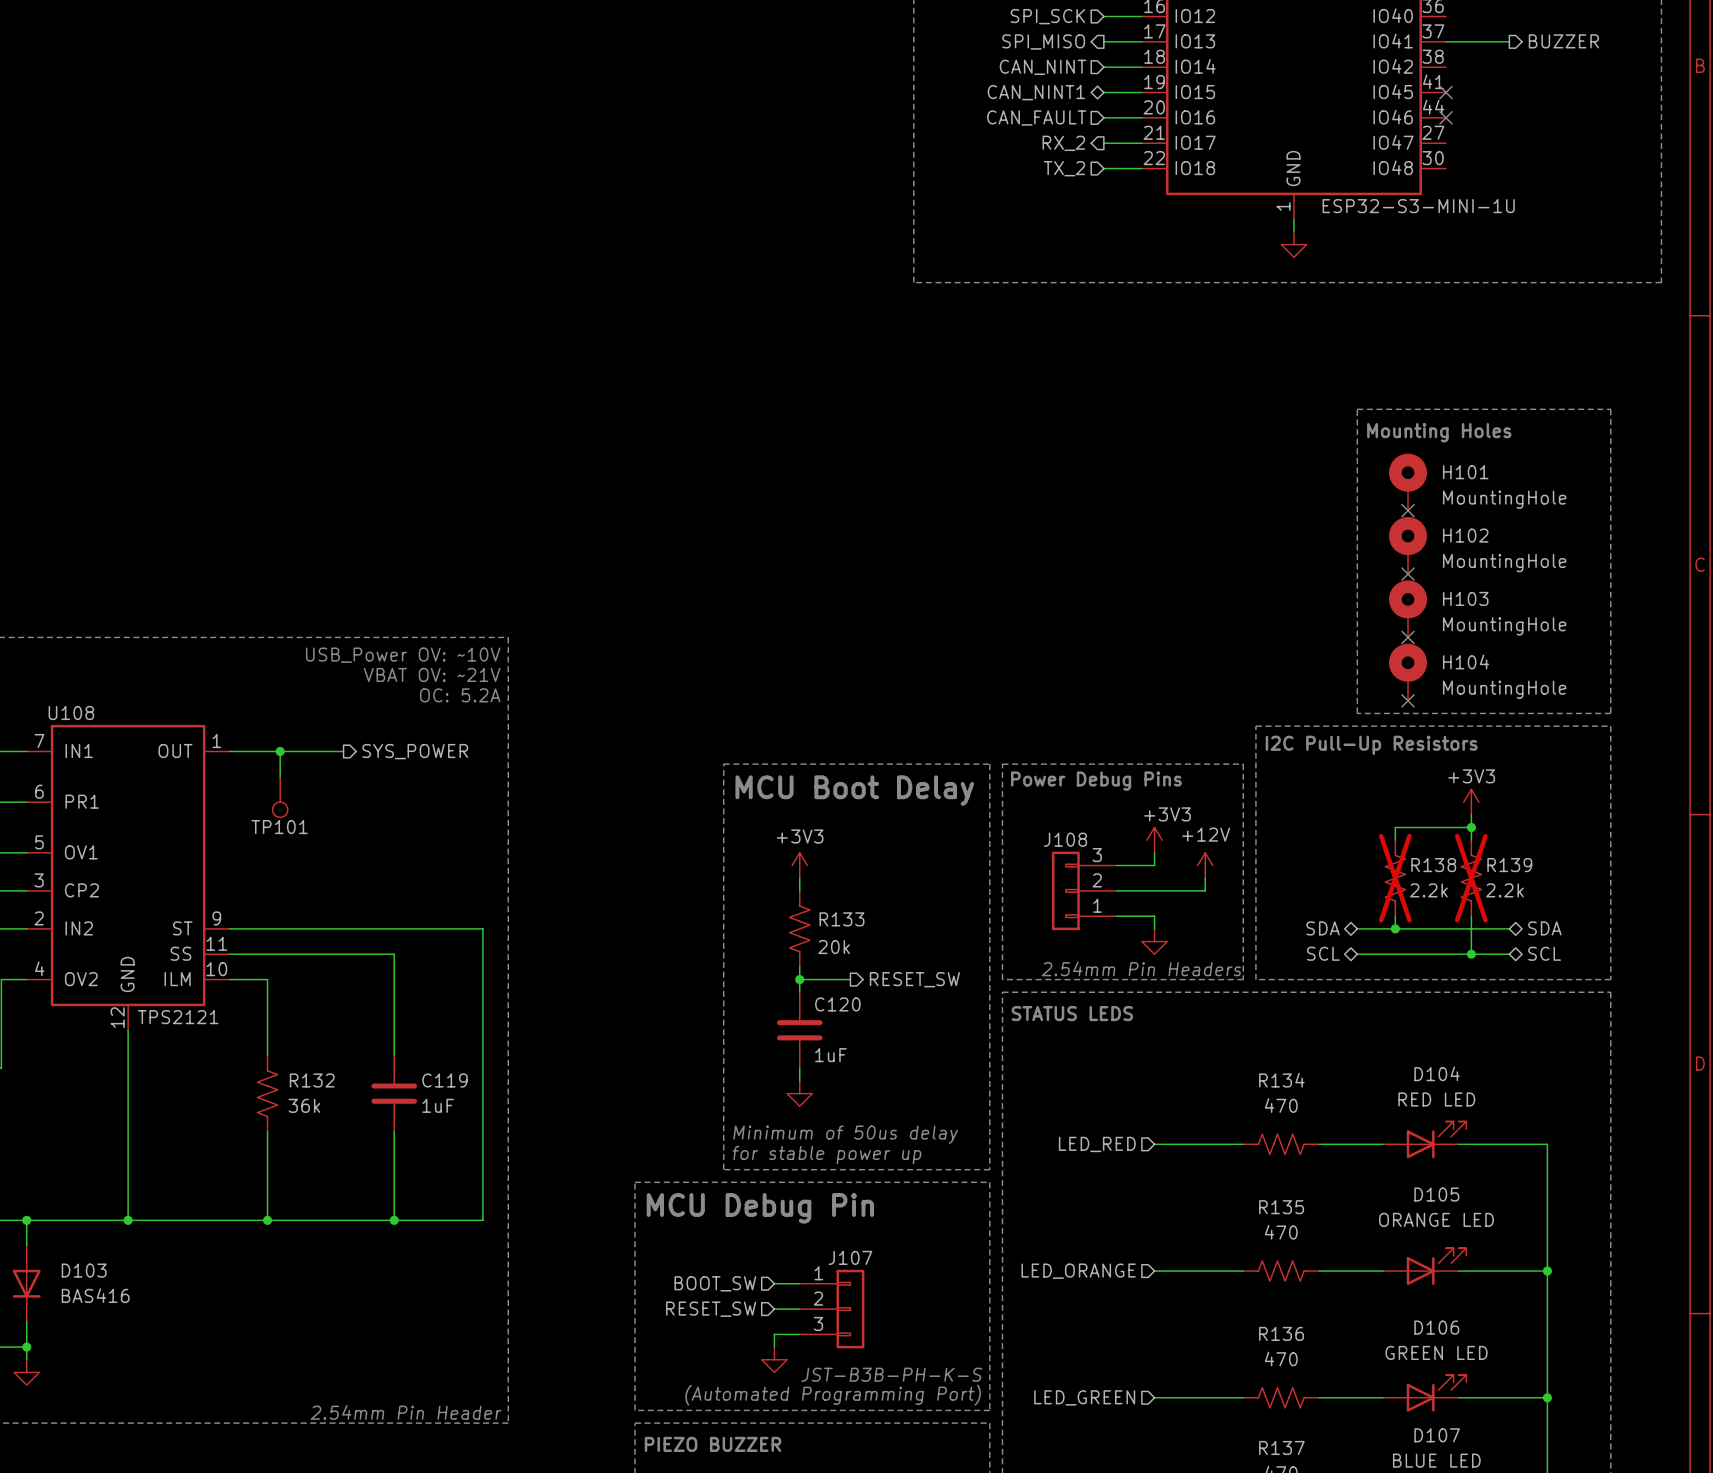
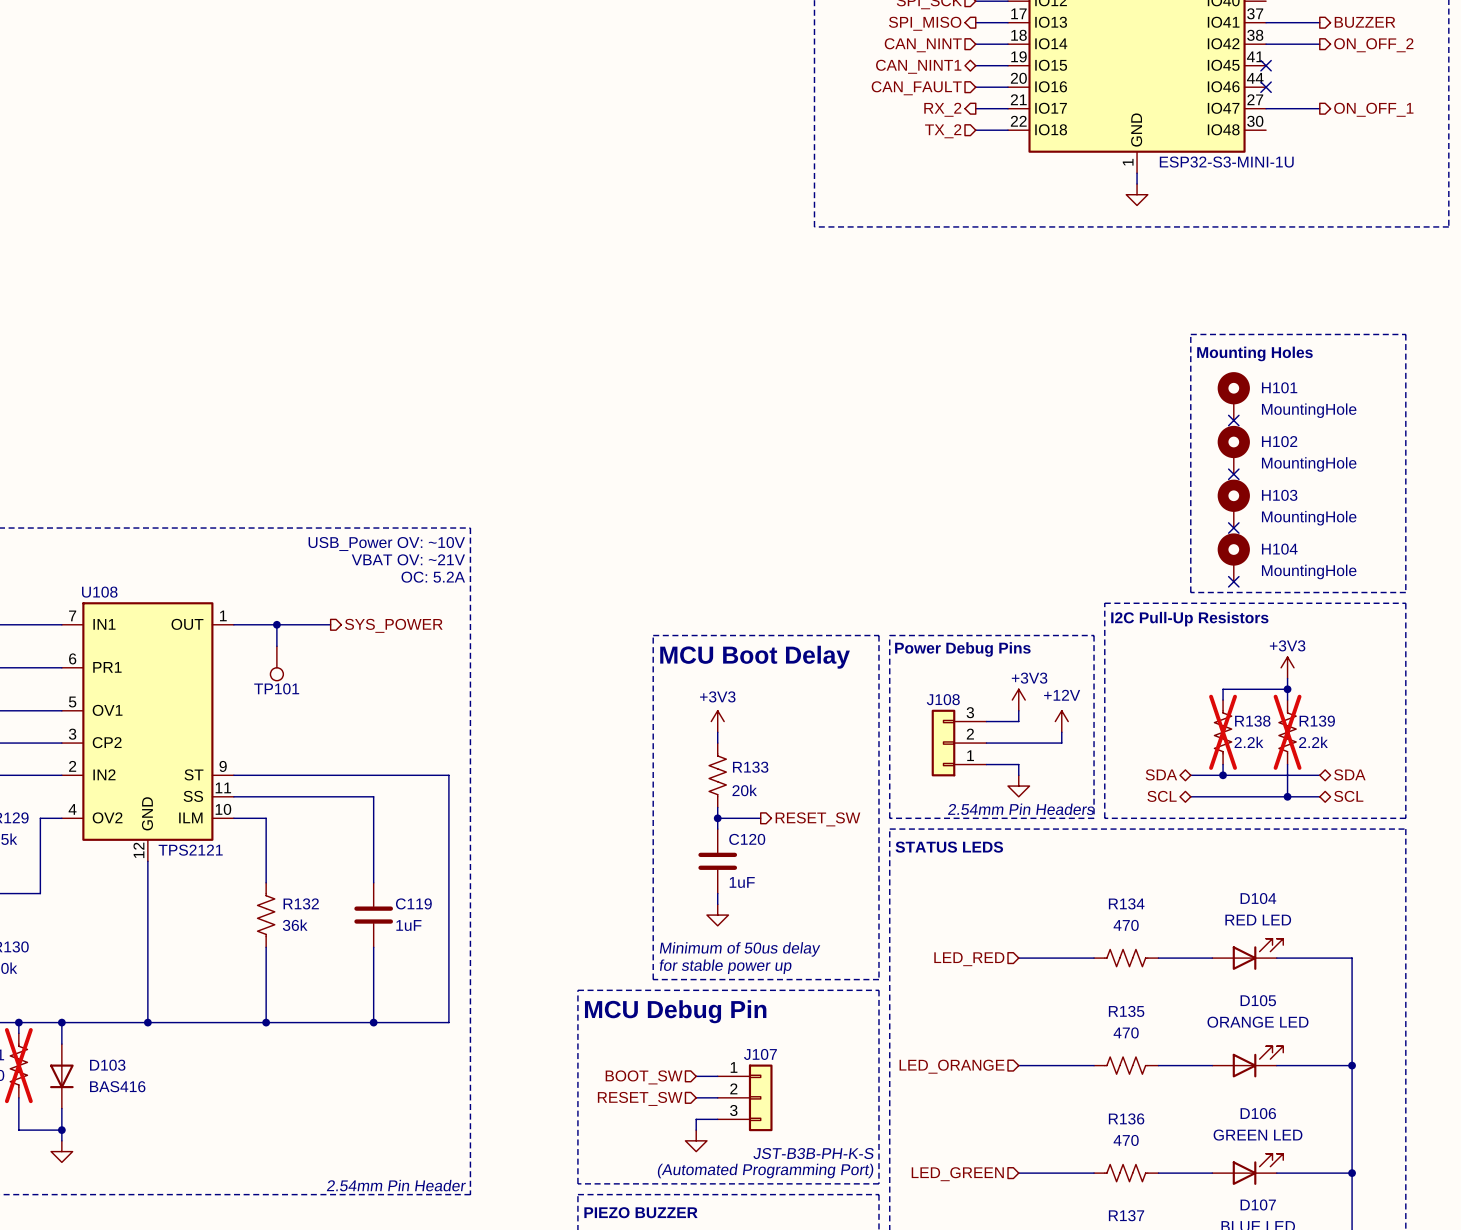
wire: none -> (1266, 44) (1319, 44)
hierarchical label: none -> ON_OFF_2 (1373, 45)
wire: none -> (1266, 108) (1319, 108)
hierarchical label: none -> ON_OFF_1 (1373, 109)

